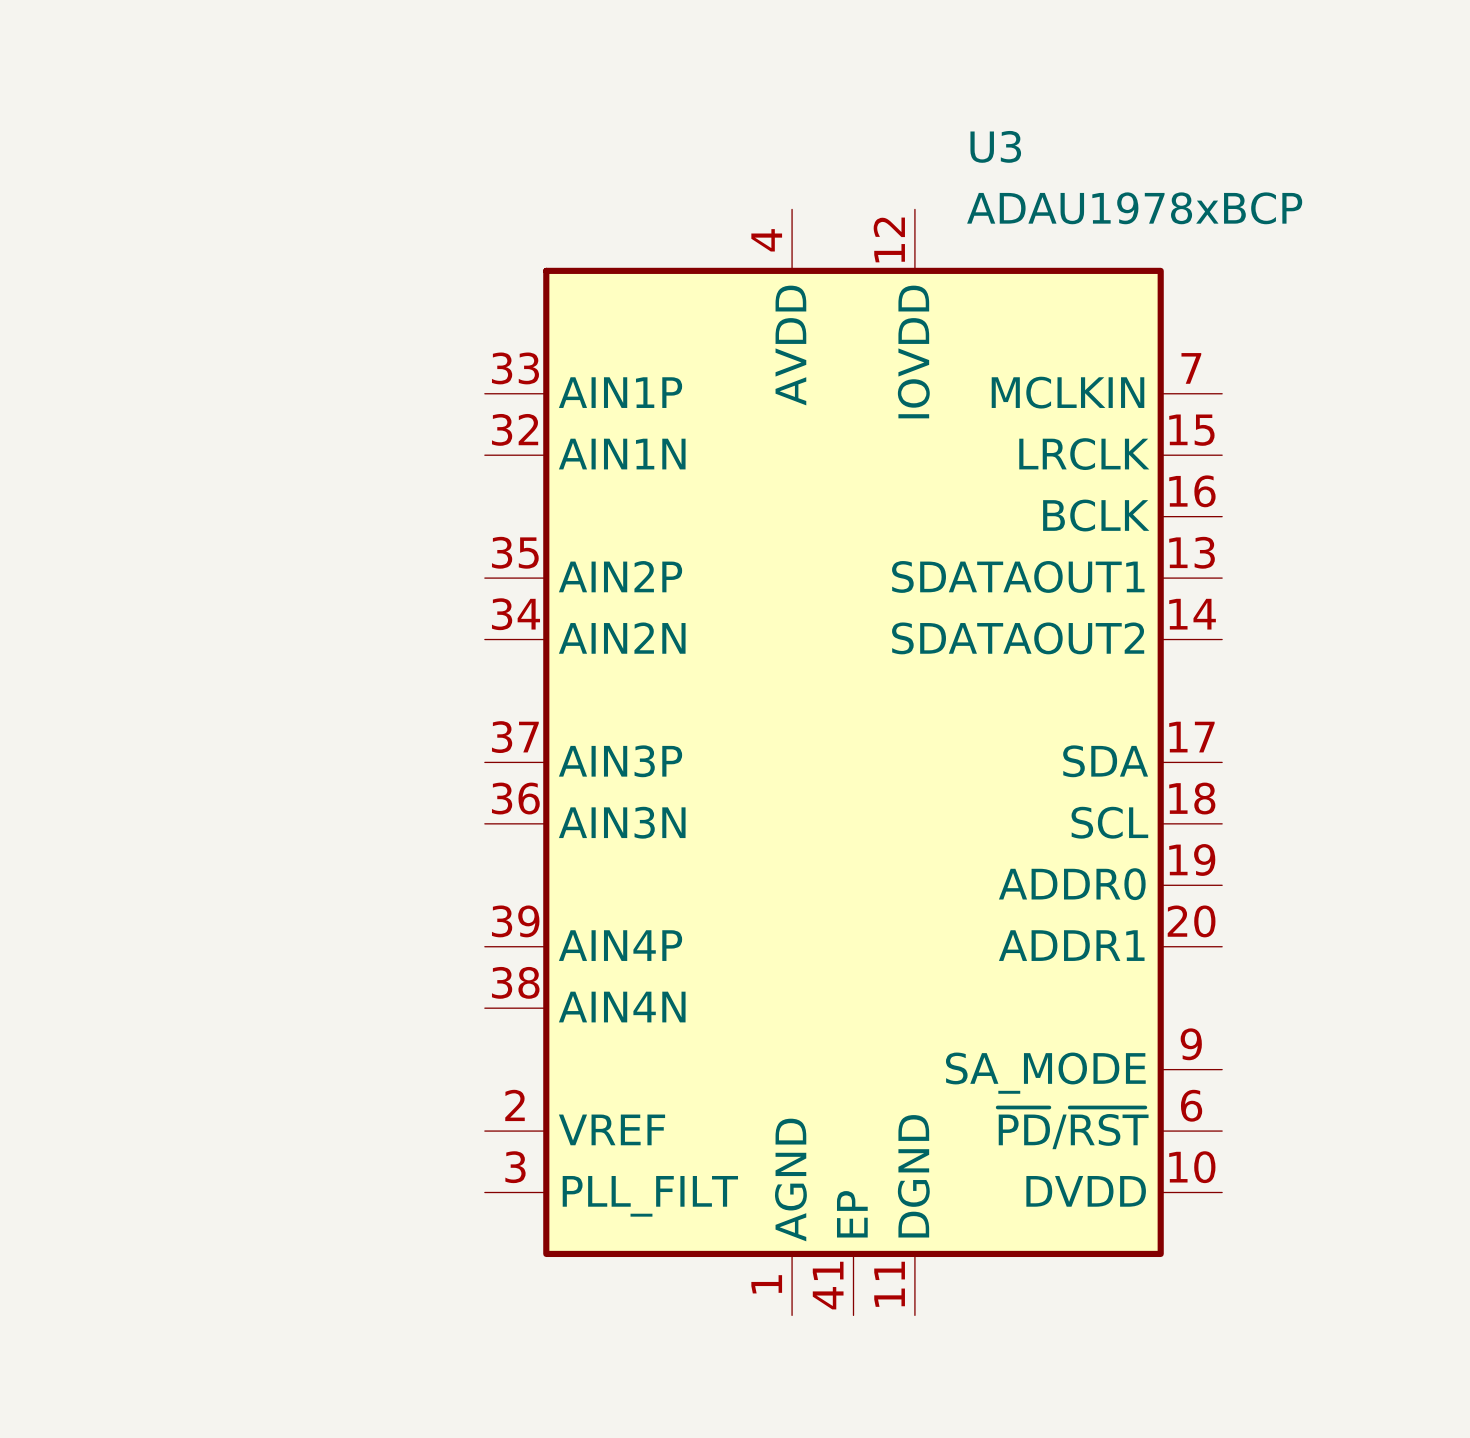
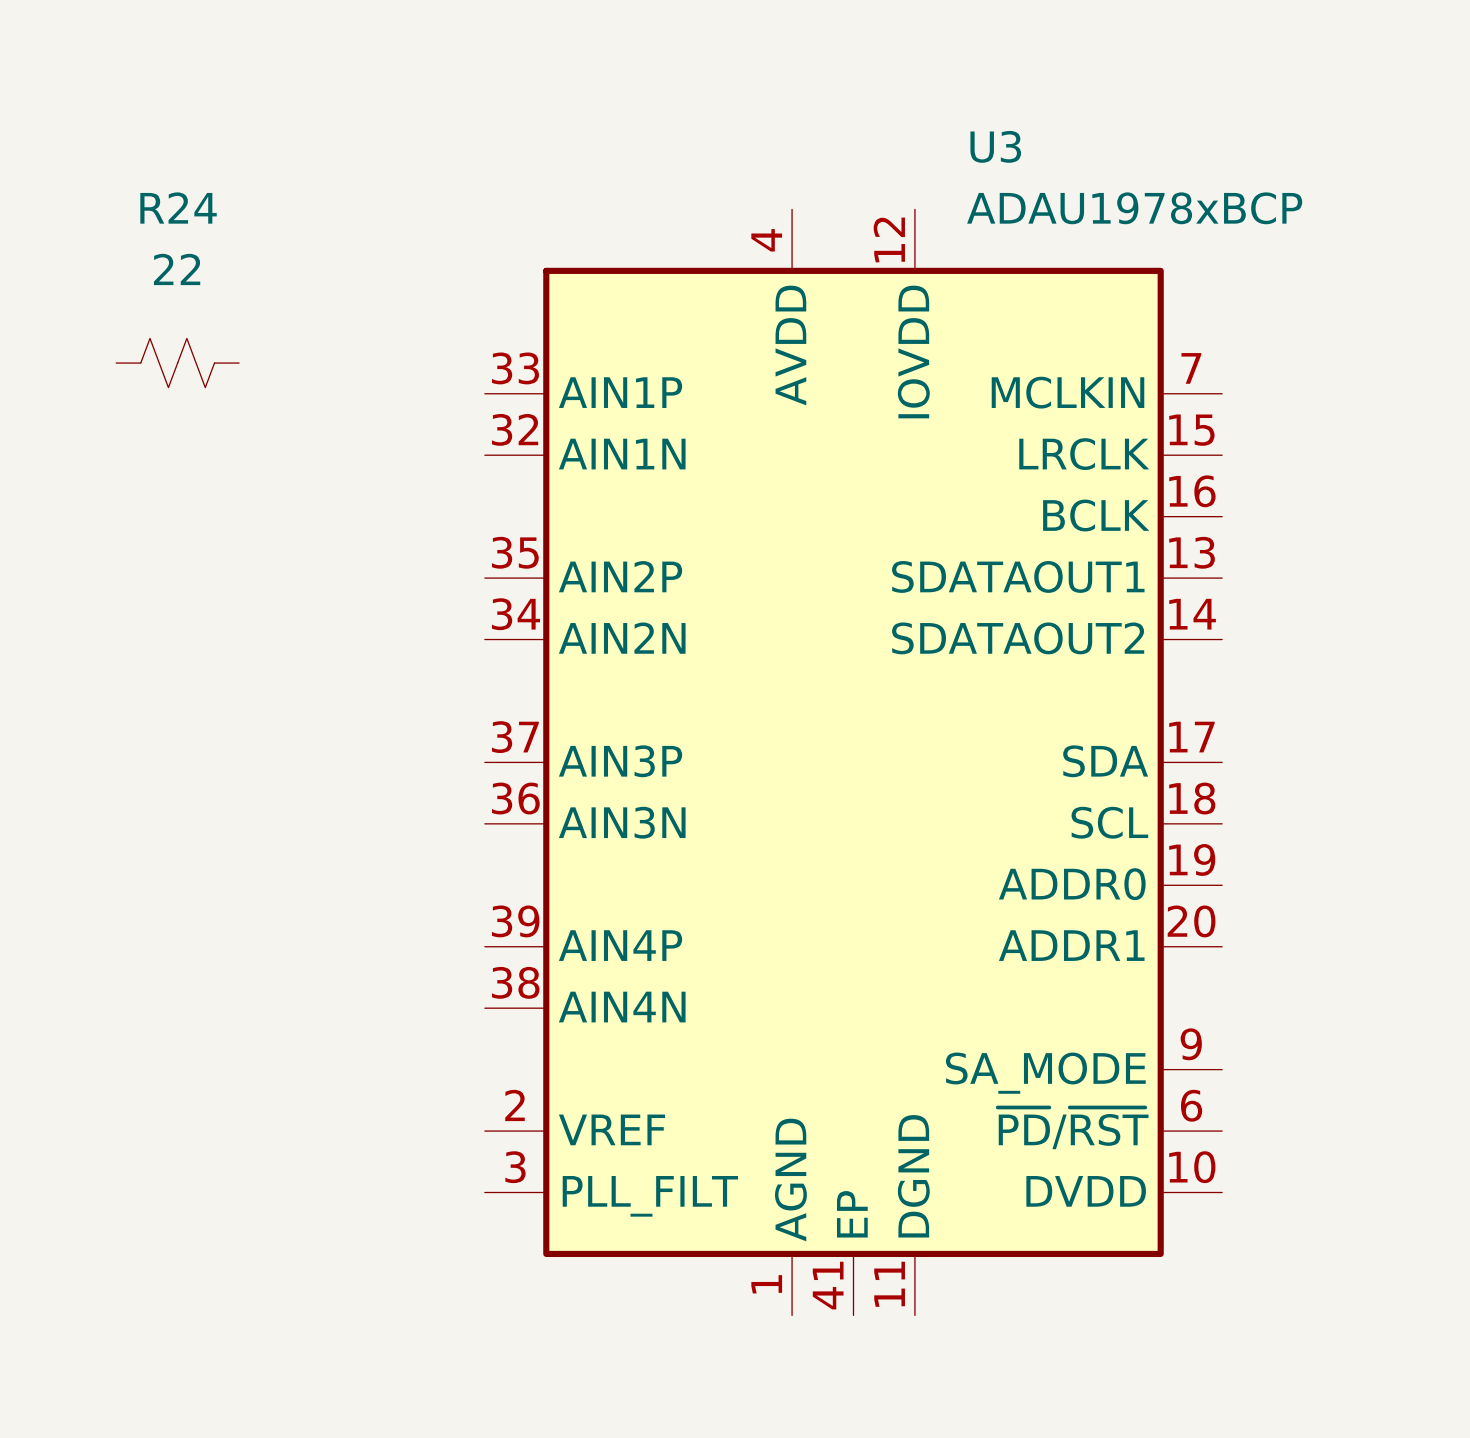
R24: none -> 22 (177, 363)

